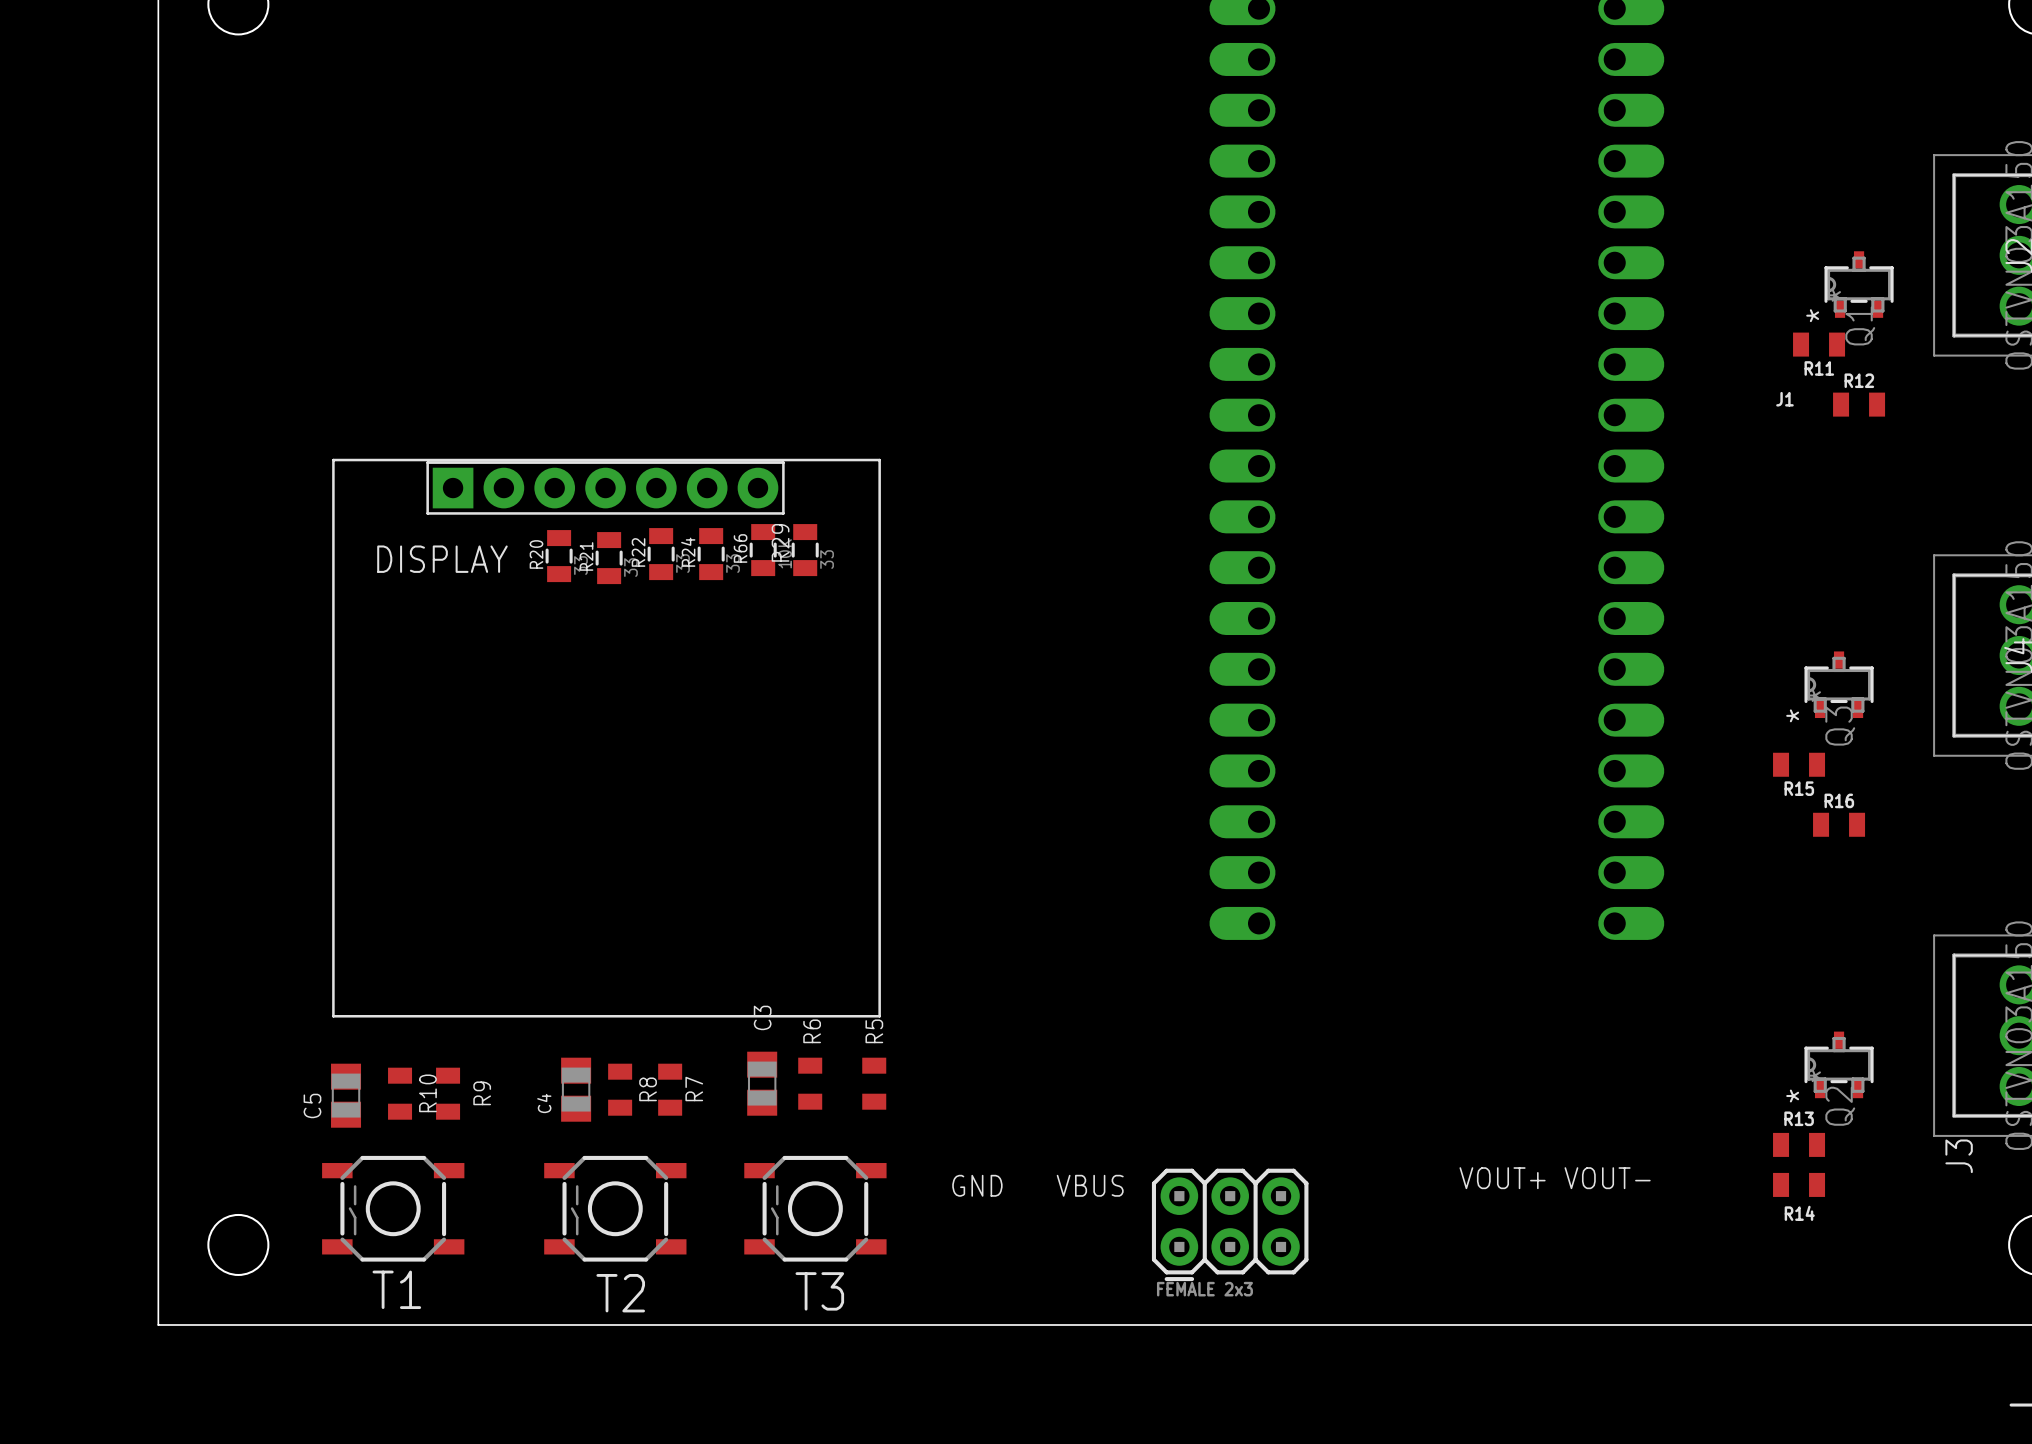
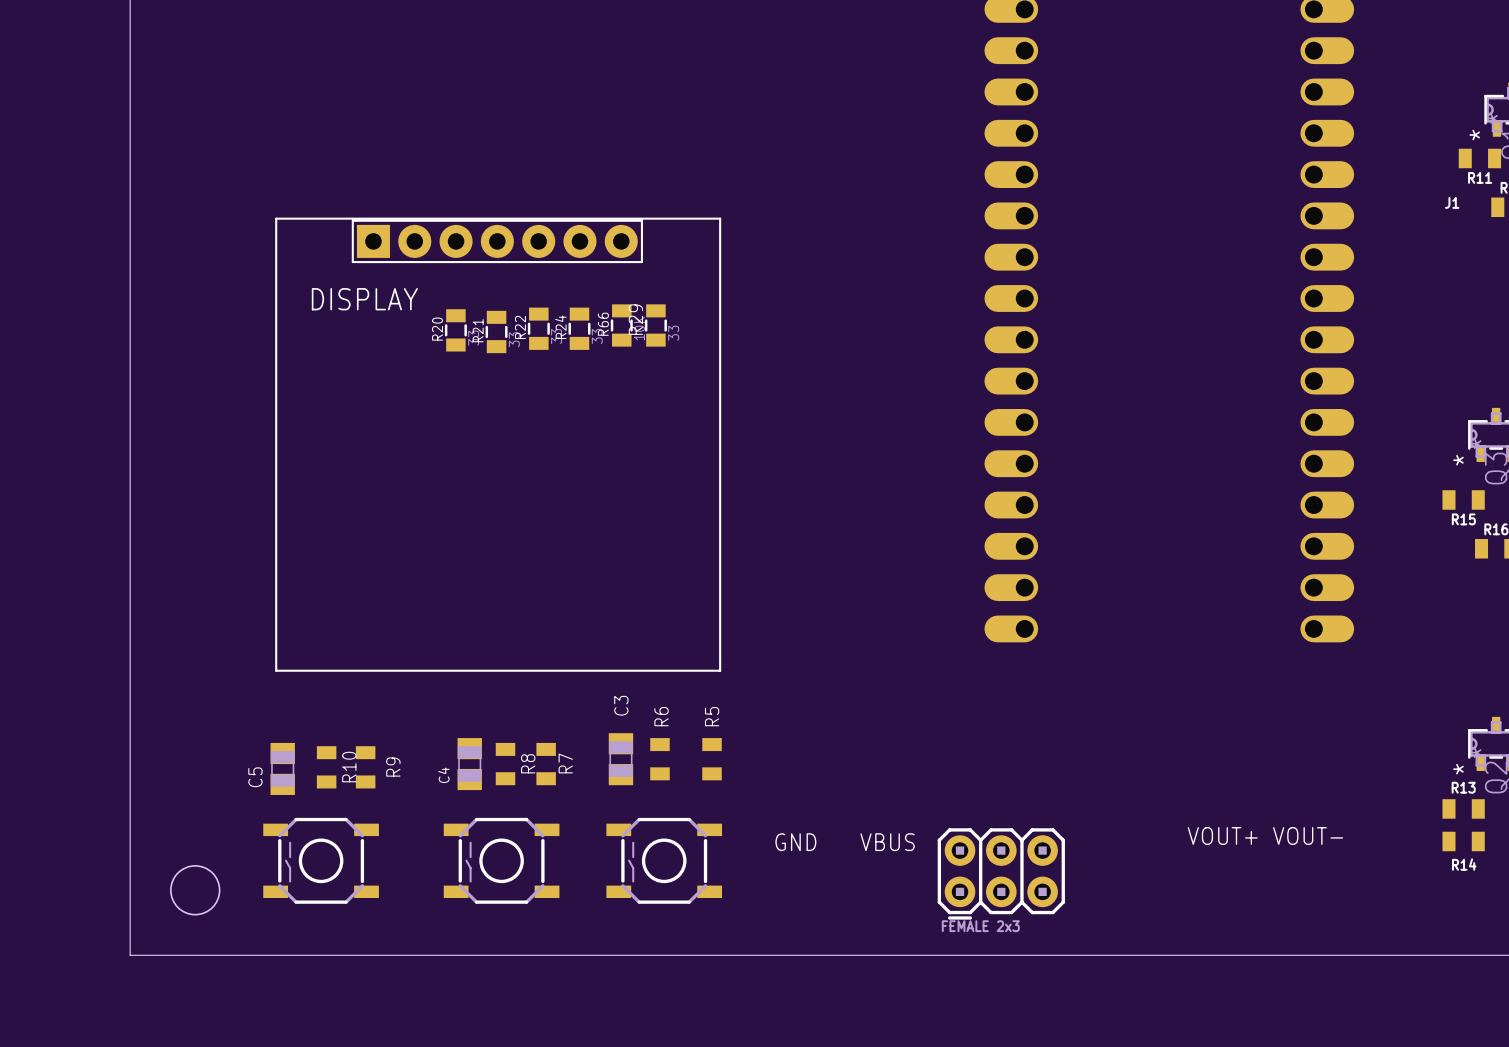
DISPLAY position: (606, 738) -> (498, 444)
text: T1 (396, 1289) -> none
text: T3 (819, 1291) -> none
text: T2 (620, 1293) -> none

